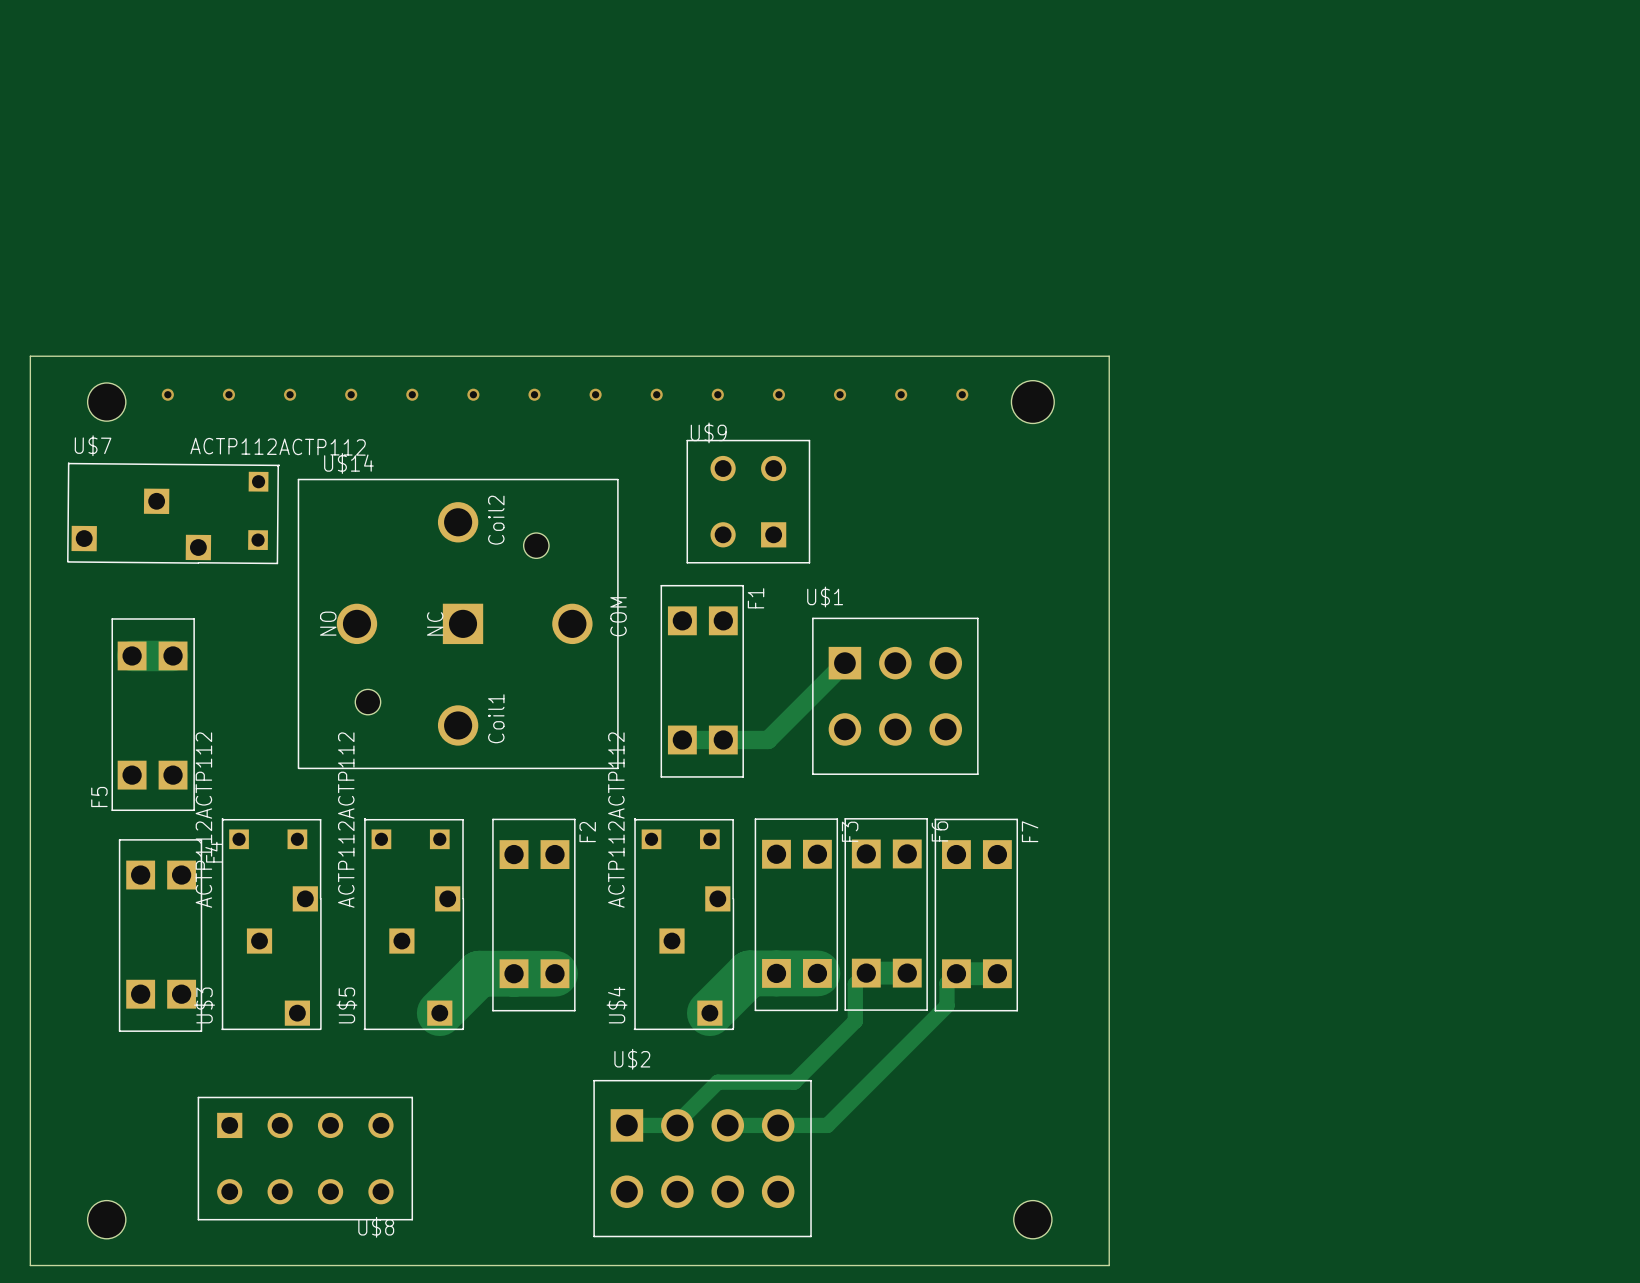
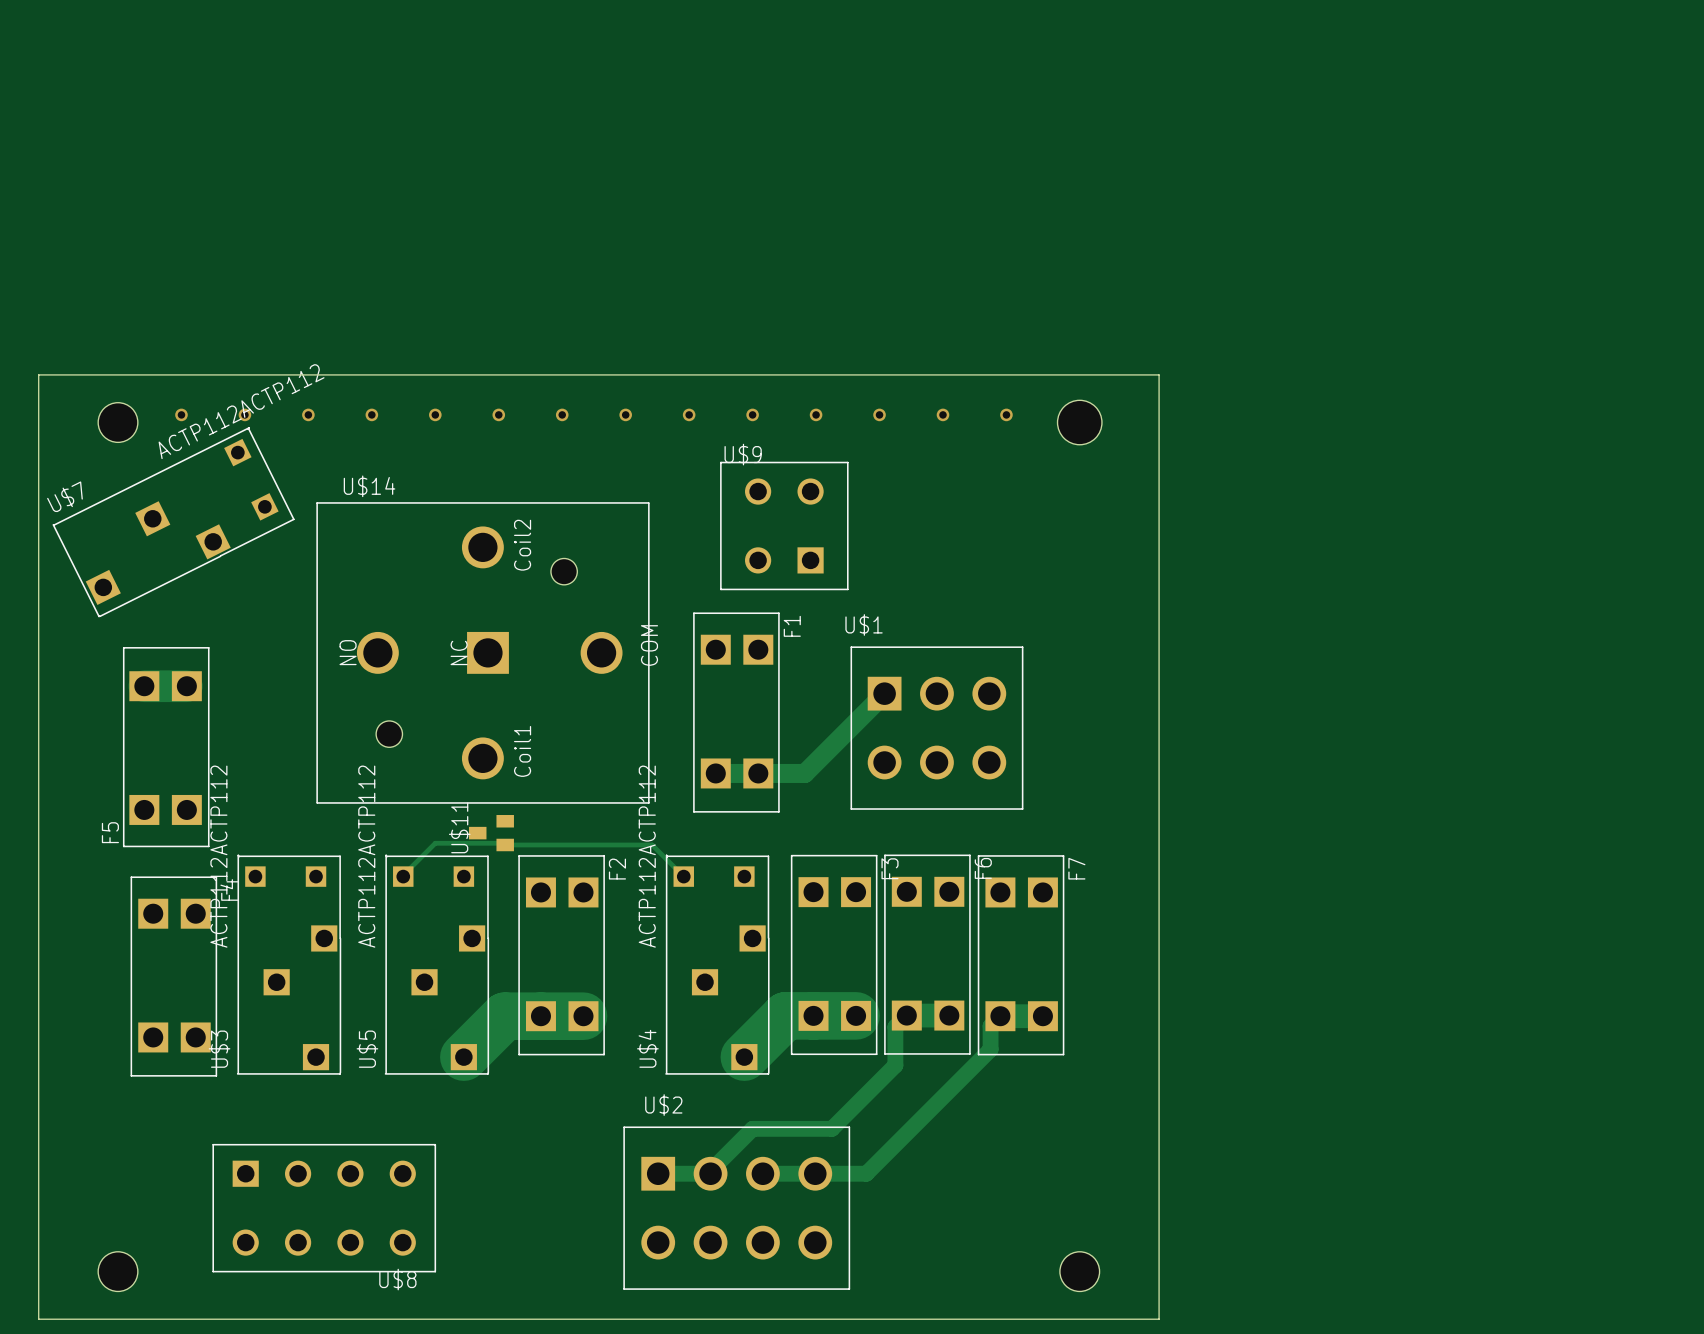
U$7 rotation: 0° (173, 513) -> 27° counterclockwise (173, 522)
U$11: none -> (491, 833)
track: none -> (403, 876) (435, 843) (652, 844) (683, 876)

